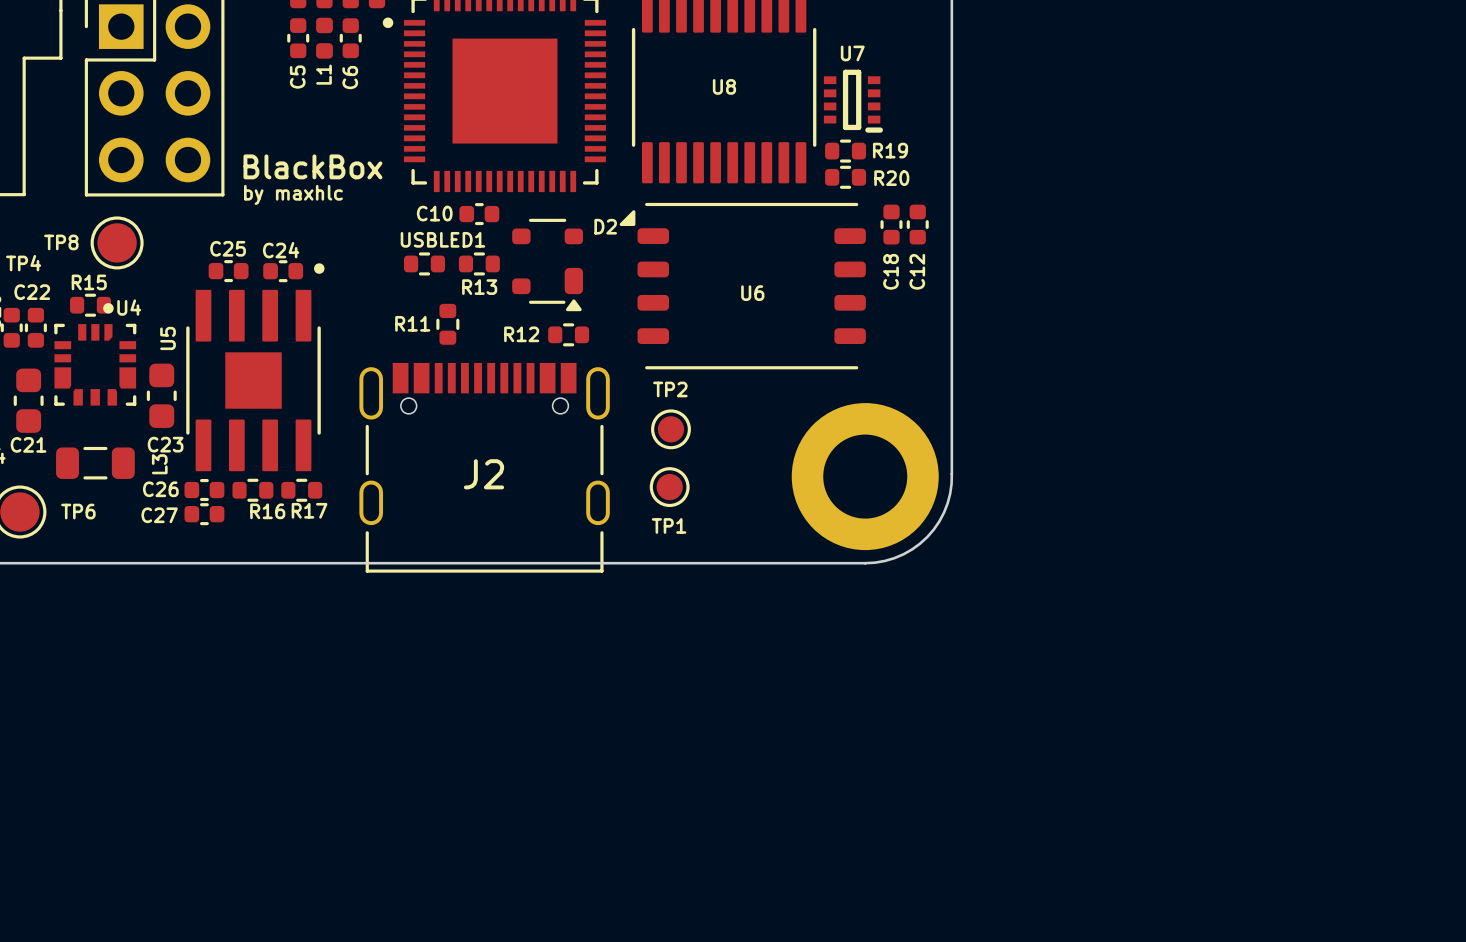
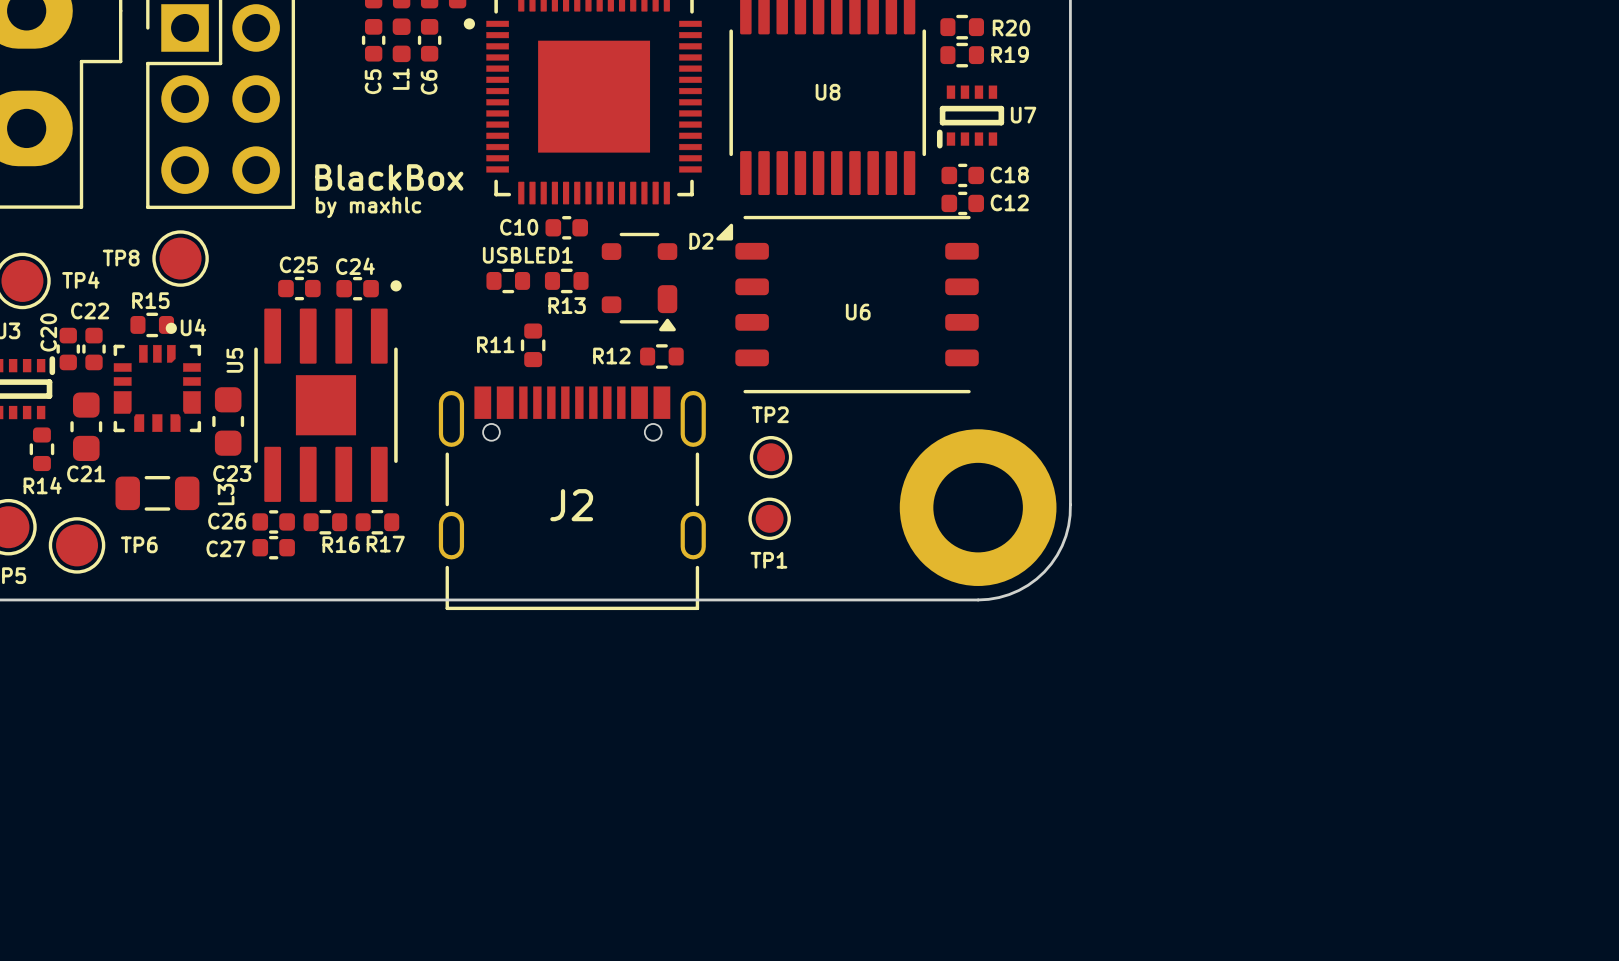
U7 rotation: 0° (853, 101) -> 90° clockwise (970, 117)
R19 position: (845, 151) -> (962, 55)
R20 position: (845, 177) -> (962, 27)
C18 rotation: 0° (891, 224) -> 90° clockwise (962, 175)
C18 position: (891, 224) -> (962, 175)
C12 rotation: 0° (917, 224) -> 90° clockwise (962, 203)
C12 position: (917, 224) -> (962, 203)
C18 name position: C18 (891, 271) -> C18 (1009, 174)
C12 name position: C12 (917, 271) -> C12 (1009, 202)

